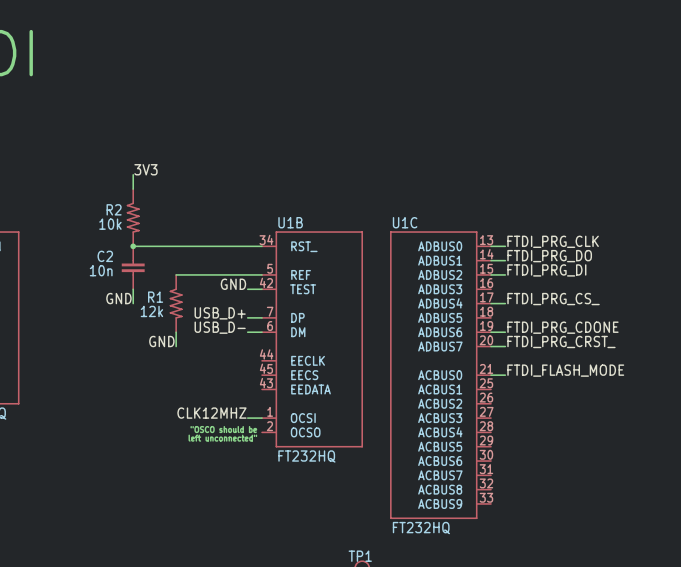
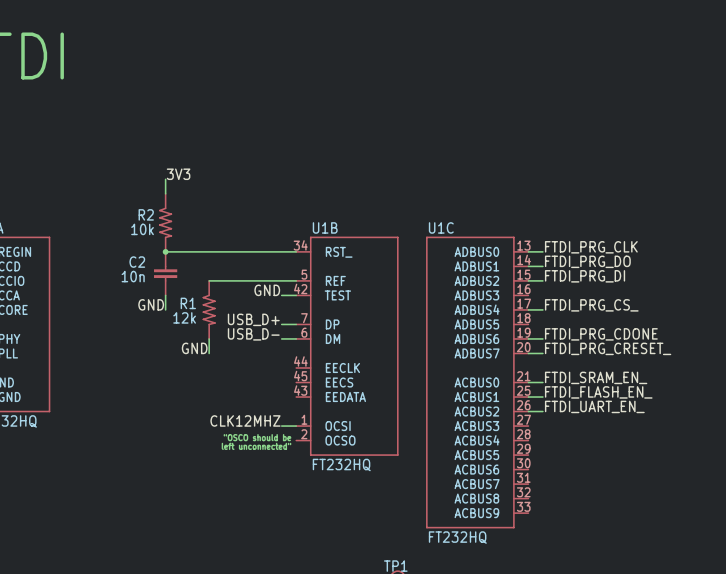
label: FTDI_PRG_CRST_ (561, 341) -> FTDI_PRG_CRESET_ (608, 348)
label: FTDI_FLASH_MODE (565, 370) -> FTDI_SRAM_EN_ (596, 377)
label: none -> FTDI_FLASH_EN_ (598, 392)
wire: none -> (528, 397) (542, 397)
label: none -> FTDI_UART_EN_ (594, 406)
wire: none -> (528, 411) (542, 411)

